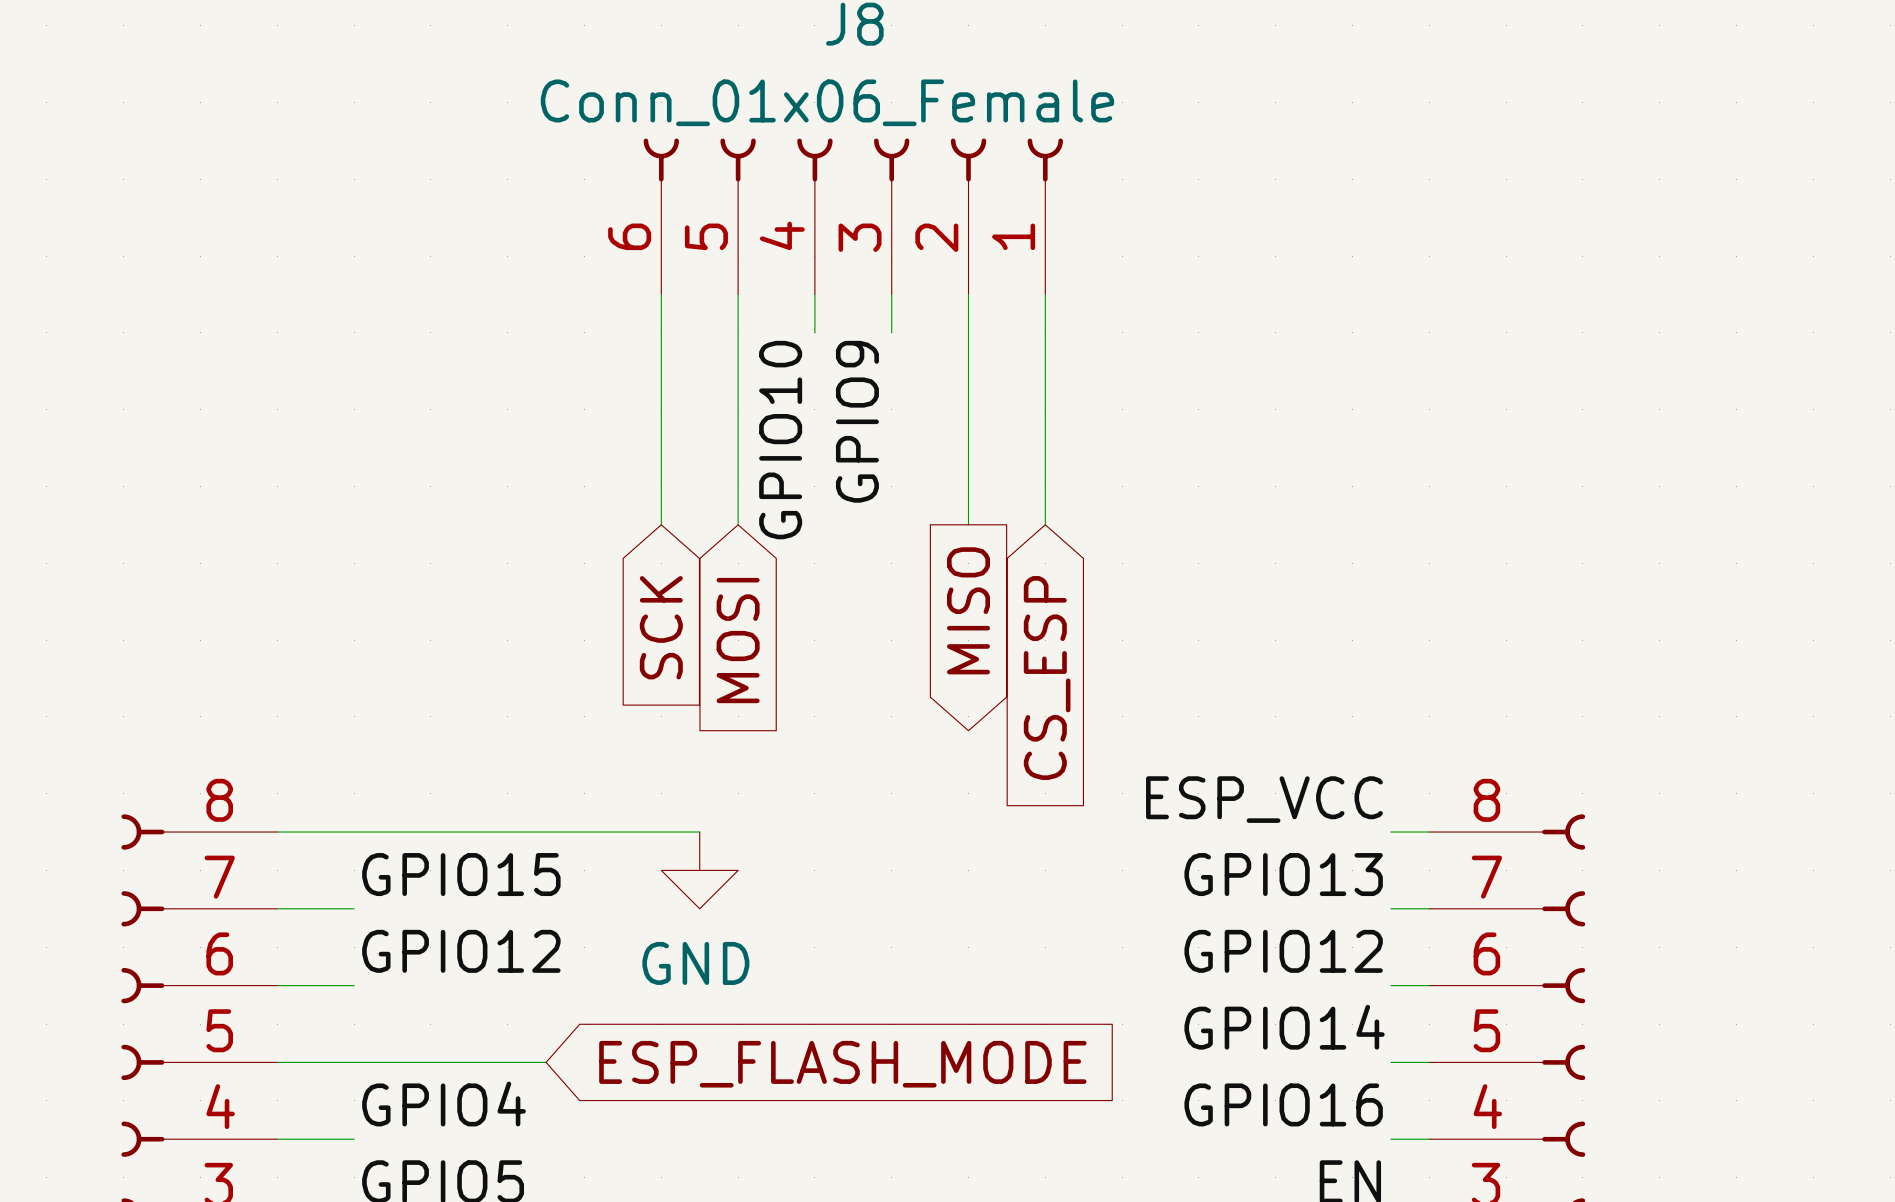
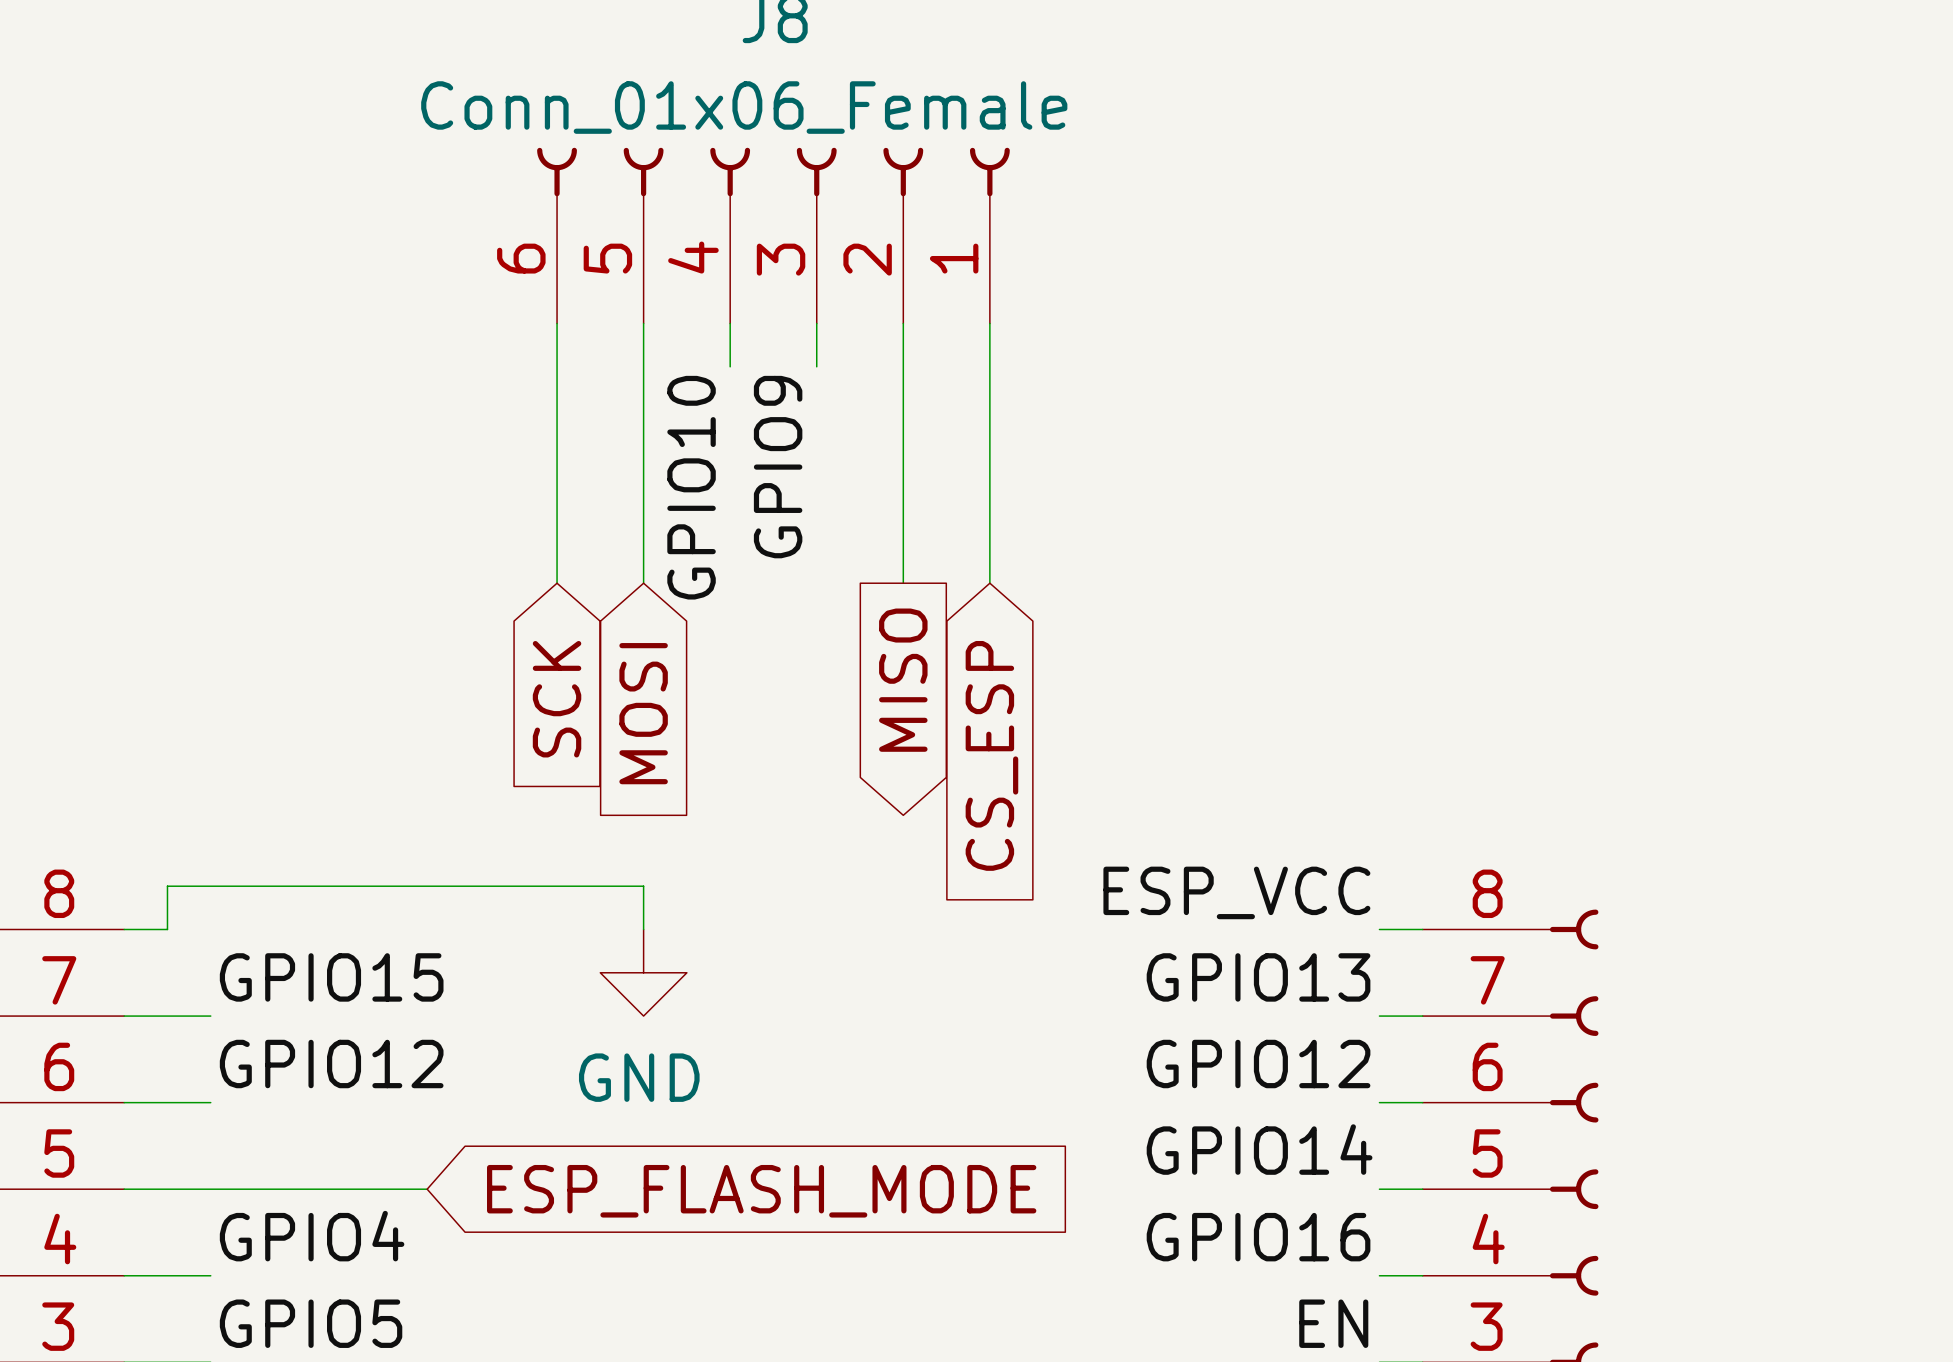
wire: (315, 832) (699, 832) -> (167, 929) (167, 886) (643, 886) (643, 929)
power symbol position: GND (699, 870) -> GND (643, 972)

